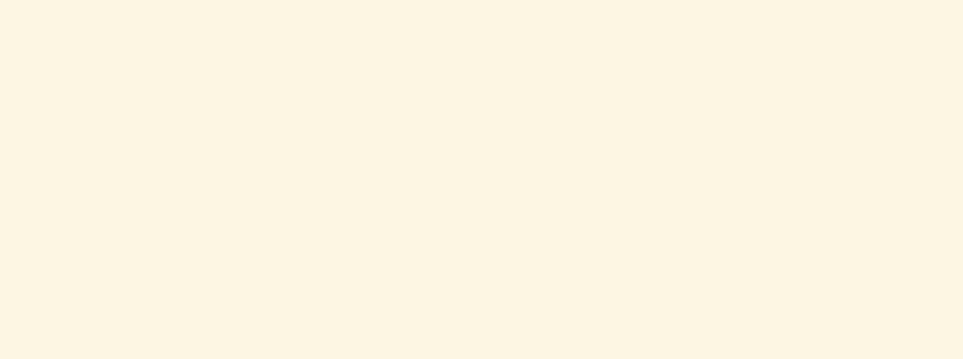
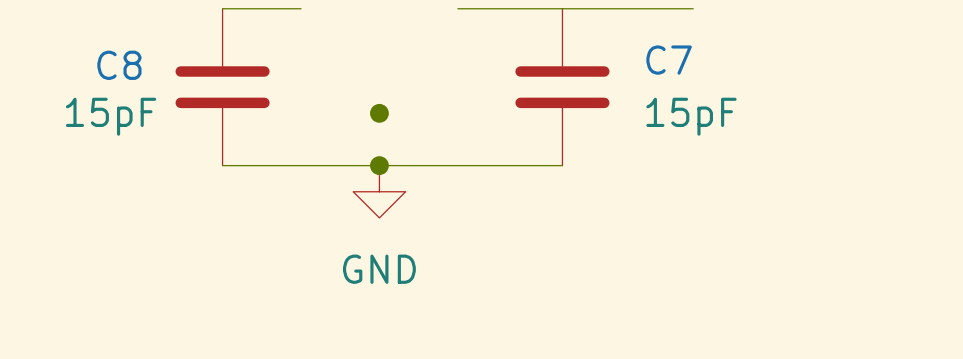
wire: none -> (222, 8) (301, 8)
wire: none -> (457, 8) (693, 8)
C8: none -> 15pF (222, 87)
C7: none -> 15pF (562, 87)
junction: none -> (379, 113)
wire: none -> (222, 165) (562, 165)
junction: none -> (379, 165)
power symbol: none -> GND (379, 191)

